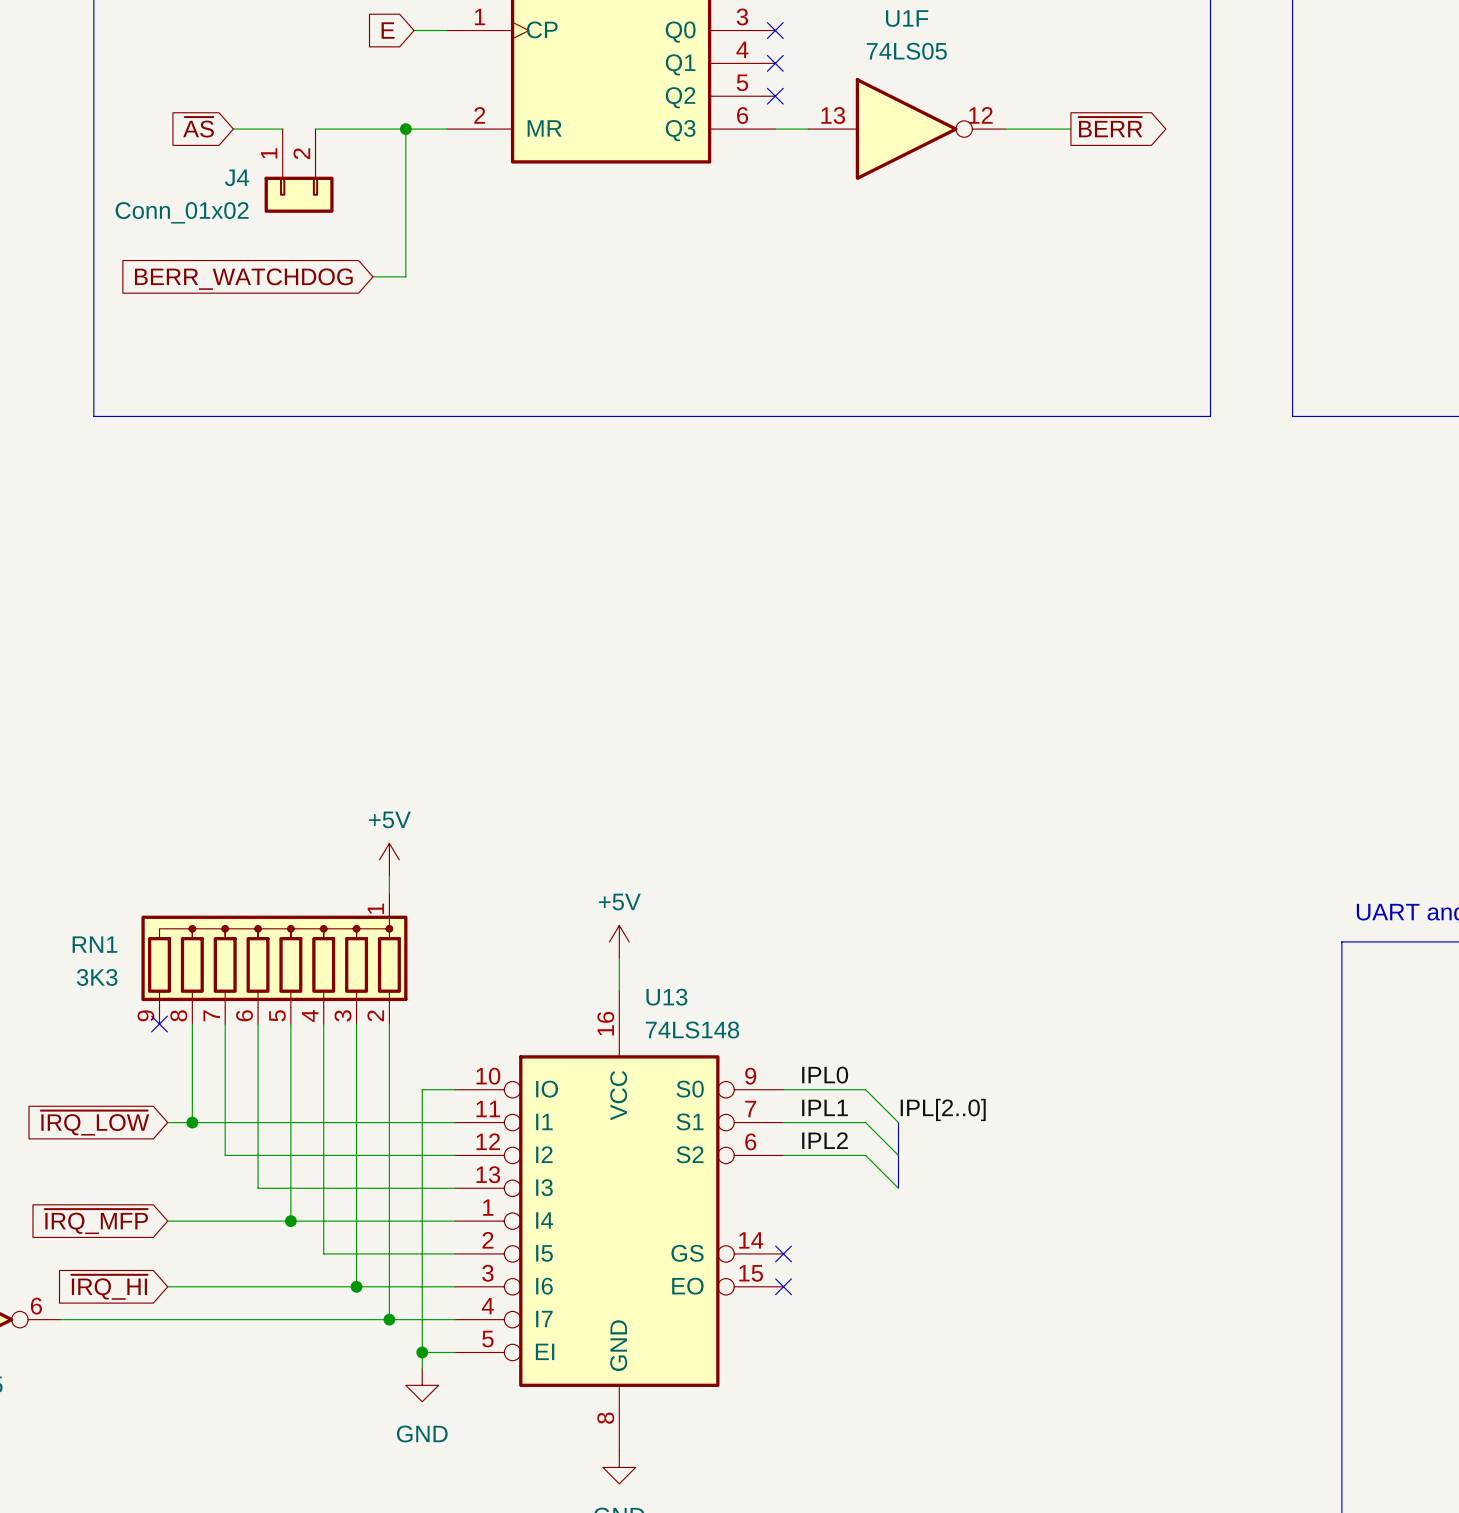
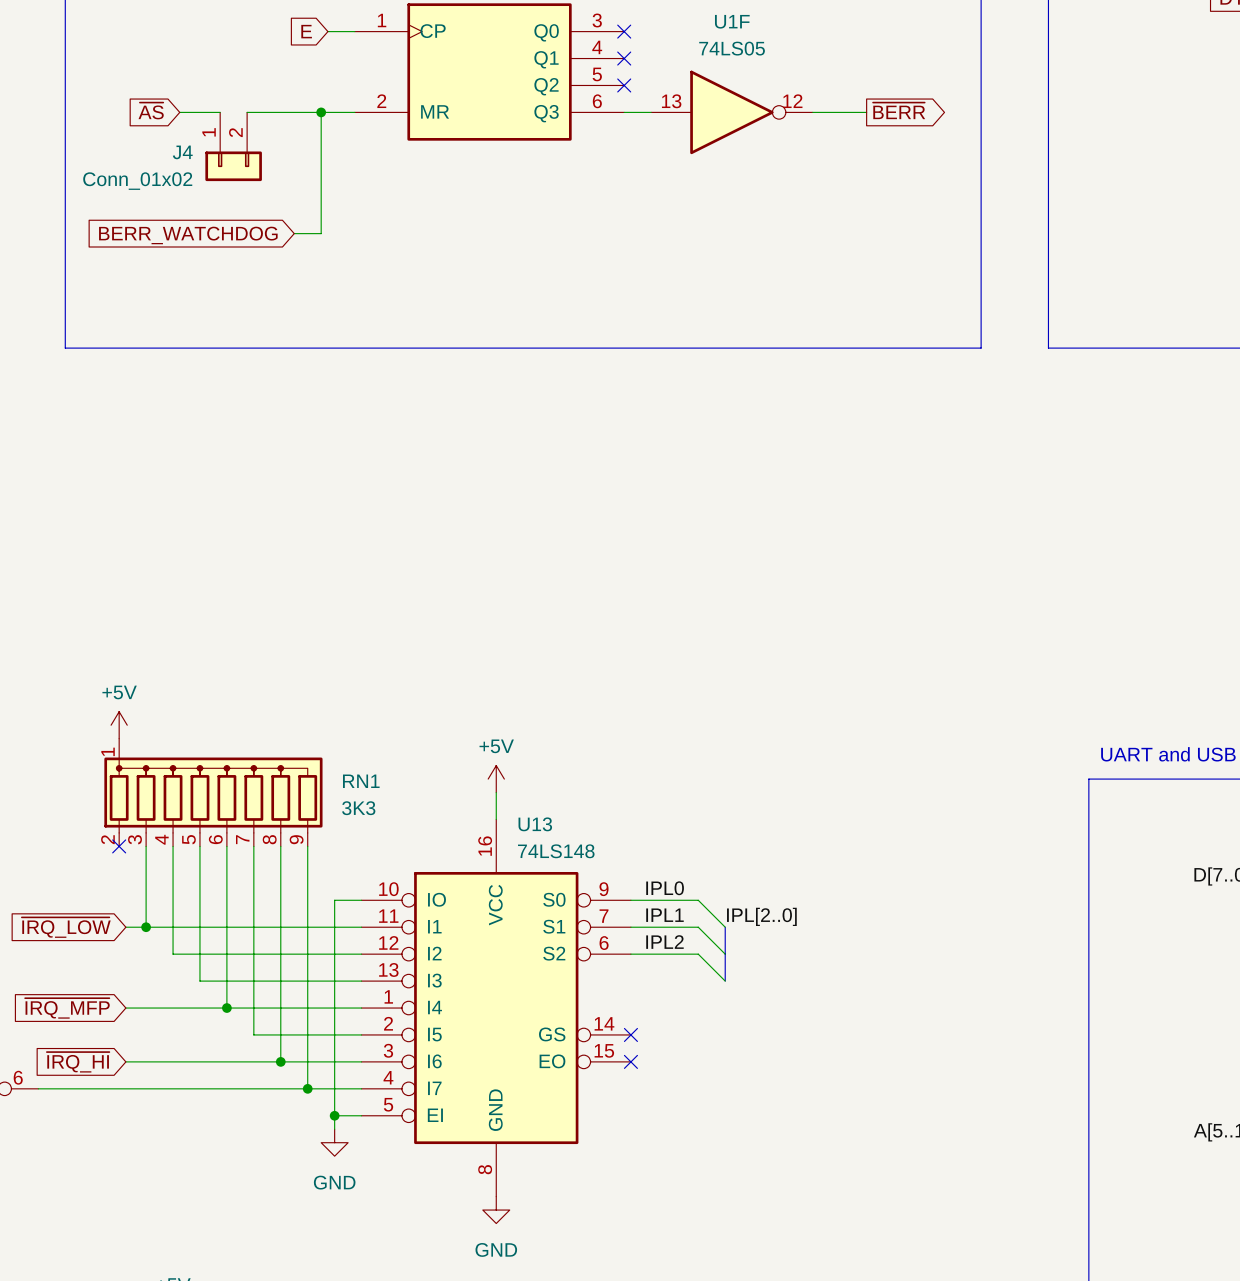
power symbol position: +5V (389, 859) -> +5V (119, 725)
wire: (389, 876) (389, 892) -> none
RN1 flip: as is (274, 961) -> left-right (213, 795)

